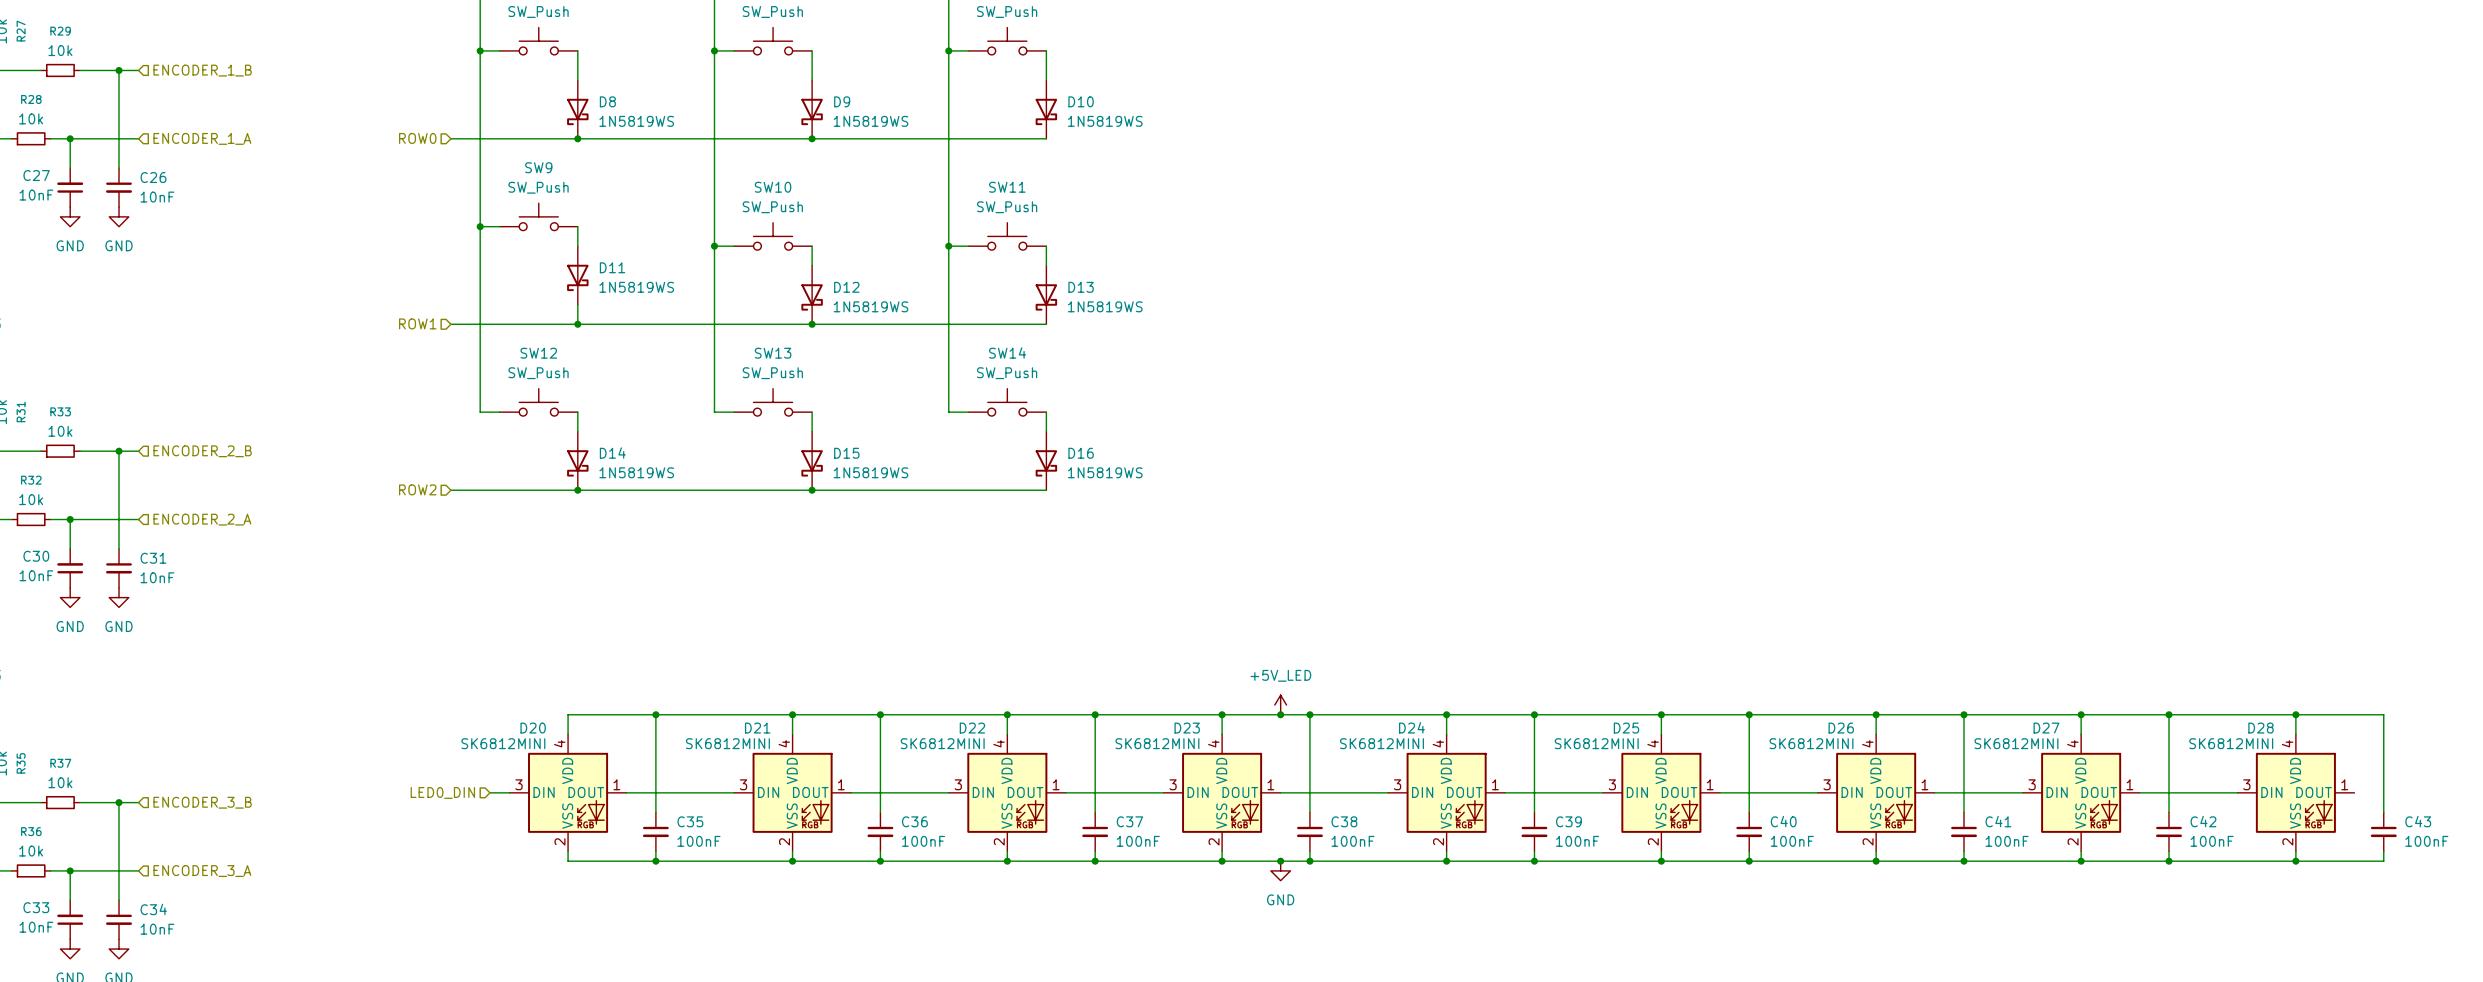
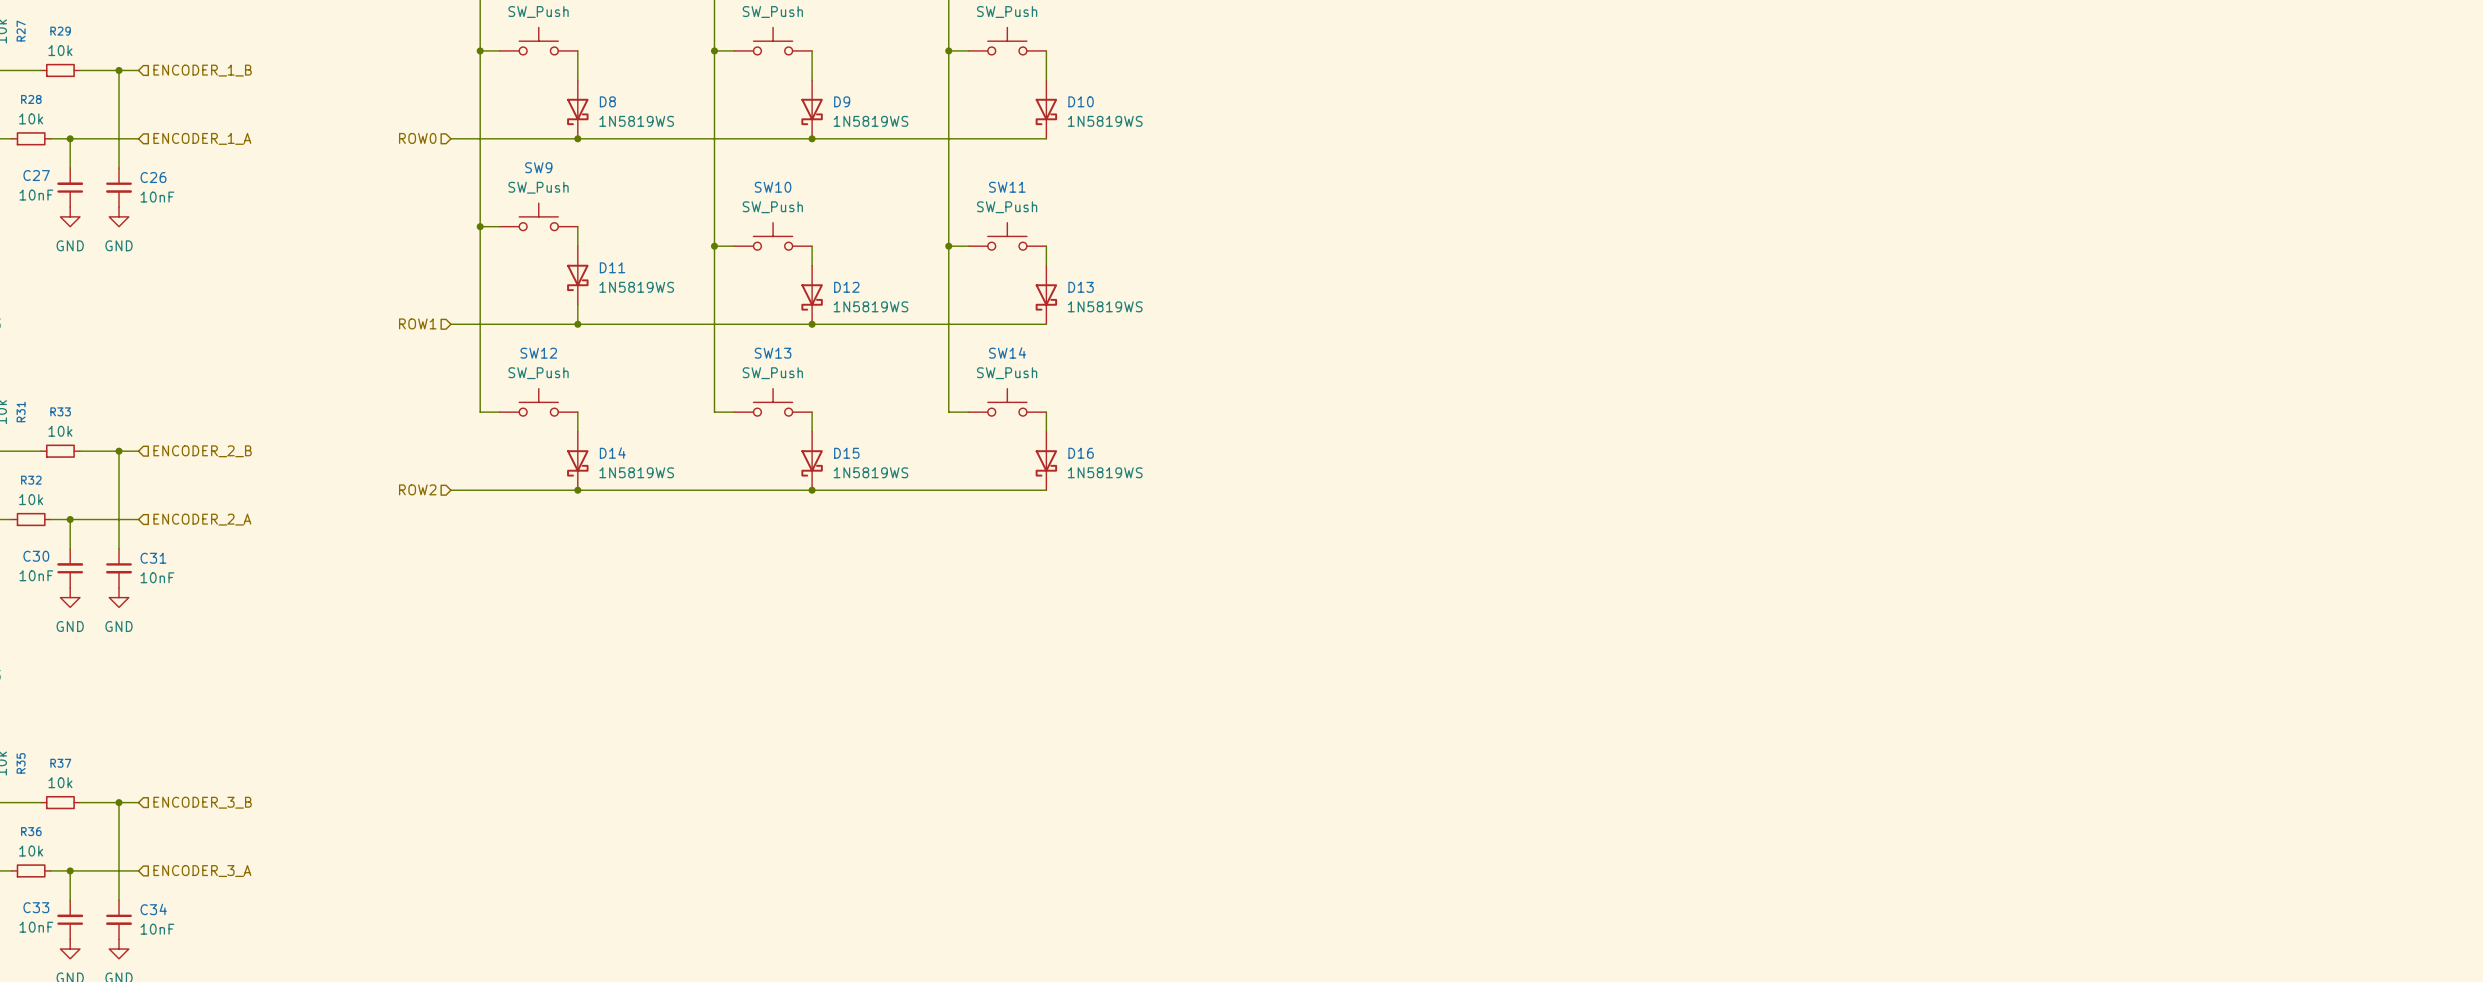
power symbol: +5V_LED (1280, 704) -> none
wire: (655, 714) (655, 812) -> none
junction: (655, 714) -> none
wire: (792, 714) (792, 734) -> none
junction: (792, 714) -> none
wire: (880, 714) (880, 812) -> none
junction: (880, 714) -> none
wire: (1007, 714) (1007, 734) -> none
junction: (1007, 714) -> none
wire: (1095, 714) (1095, 812) -> none
junction: (1095, 714) -> none
wire: (1222, 714) (1222, 734) -> none
junction: (1222, 714) -> none
junction: (1280, 714) -> none
wire: (1309, 714) (1309, 812) -> none
junction: (1309, 714) -> none
wire: (1446, 714) (1446, 734) -> none
junction: (1446, 714) -> none
wire: (1534, 714) (1534, 812) -> none
junction: (1534, 714) -> none
wire: (1661, 714) (1661, 734) -> none
junction: (1661, 714) -> none
wire: (1749, 714) (1749, 812) -> none
junction: (1749, 714) -> none
wire: (1876, 714) (1876, 734) -> none
junction: (1876, 714) -> none
wire: (1963, 714) (1963, 812) -> none
junction: (1963, 714) -> none
wire: (2081, 714) (2081, 734) -> none
junction: (2081, 714) -> none
wire: (2168, 714) (2168, 812) -> none
junction: (2168, 714) -> none
wire: (2295, 714) (2295, 734) -> none
junction: (2295, 714) -> none
wire: (568, 734) (568, 714) (2383, 714) (2383, 812) -> none
hierarchical label: LED0_DIN (442, 792) -> none
wire: (489, 792) (509, 792) -> none
D20: SK6812MINI (568, 792) -> none
wire: (626, 792) (734, 792) -> none
D21: SK6812MINI (792, 792) -> none
wire: (851, 792) (948, 792) -> none
D22: SK6812MINI (1007, 792) -> none
wire: (1065, 792) (1163, 792) -> none
D23: SK6812MINI (1222, 792) -> none
wire: (1280, 792) (1388, 792) -> none
D24: SK6812MINI (1446, 792) -> none
wire: (1505, 792) (1602, 792) -> none
D25: SK6812MINI (1661, 792) -> none
wire: (1719, 792) (1817, 792) -> none
D26: SK6812MINI (1876, 792) -> none
wire: (1934, 792) (2022, 792) -> none
D27: SK6812MINI (2081, 792) -> none
wire: (2139, 792) (2237, 792) -> none
D28: SK6812MINI (2295, 792) -> none
C35: 100nF (655, 831) -> none
C36: 100nF (880, 831) -> none
C37: 100nF (1095, 831) -> none
C38: 100nF (1309, 831) -> none
C39: 100nF (1534, 831) -> none
C40: 100nF (1749, 831) -> none
C41: 100nF (1963, 831) -> none
C42: 100nF (2168, 831) -> none
C43: 100nF (2383, 831) -> none
wire: (568, 851) (568, 861) (2383, 861) (2383, 851) -> none
wire: (655, 851) (655, 861) -> none
wire: (792, 851) (792, 861) -> none
wire: (880, 851) (880, 861) -> none
wire: (1007, 851) (1007, 861) -> none
wire: (1095, 851) (1095, 861) -> none
wire: (1222, 851) (1222, 861) -> none
wire: (1309, 851) (1309, 861) -> none
wire: (1446, 851) (1446, 861) -> none
wire: (1534, 851) (1534, 861) -> none
wire: (1661, 851) (1661, 861) -> none
wire: (1749, 851) (1749, 861) -> none
wire: (1876, 851) (1876, 861) -> none
wire: (1963, 851) (1963, 861) -> none
wire: (2081, 851) (2081, 861) -> none
wire: (2168, 851) (2168, 861) -> none
wire: (2295, 851) (2295, 861) -> none
junction: (655, 861) -> none
junction: (792, 861) -> none
junction: (880, 861) -> none
junction: (1007, 861) -> none
junction: (1095, 861) -> none
junction: (1222, 861) -> none
junction: (1280, 861) -> none
junction: (1309, 861) -> none
junction: (1446, 861) -> none
junction: (1534, 861) -> none
junction: (1661, 861) -> none
junction: (1749, 861) -> none
junction: (1876, 861) -> none
junction: (1963, 861) -> none
junction: (2081, 861) -> none
junction: (2168, 861) -> none
junction: (2295, 861) -> none
power symbol: GND (1280, 870) -> none

